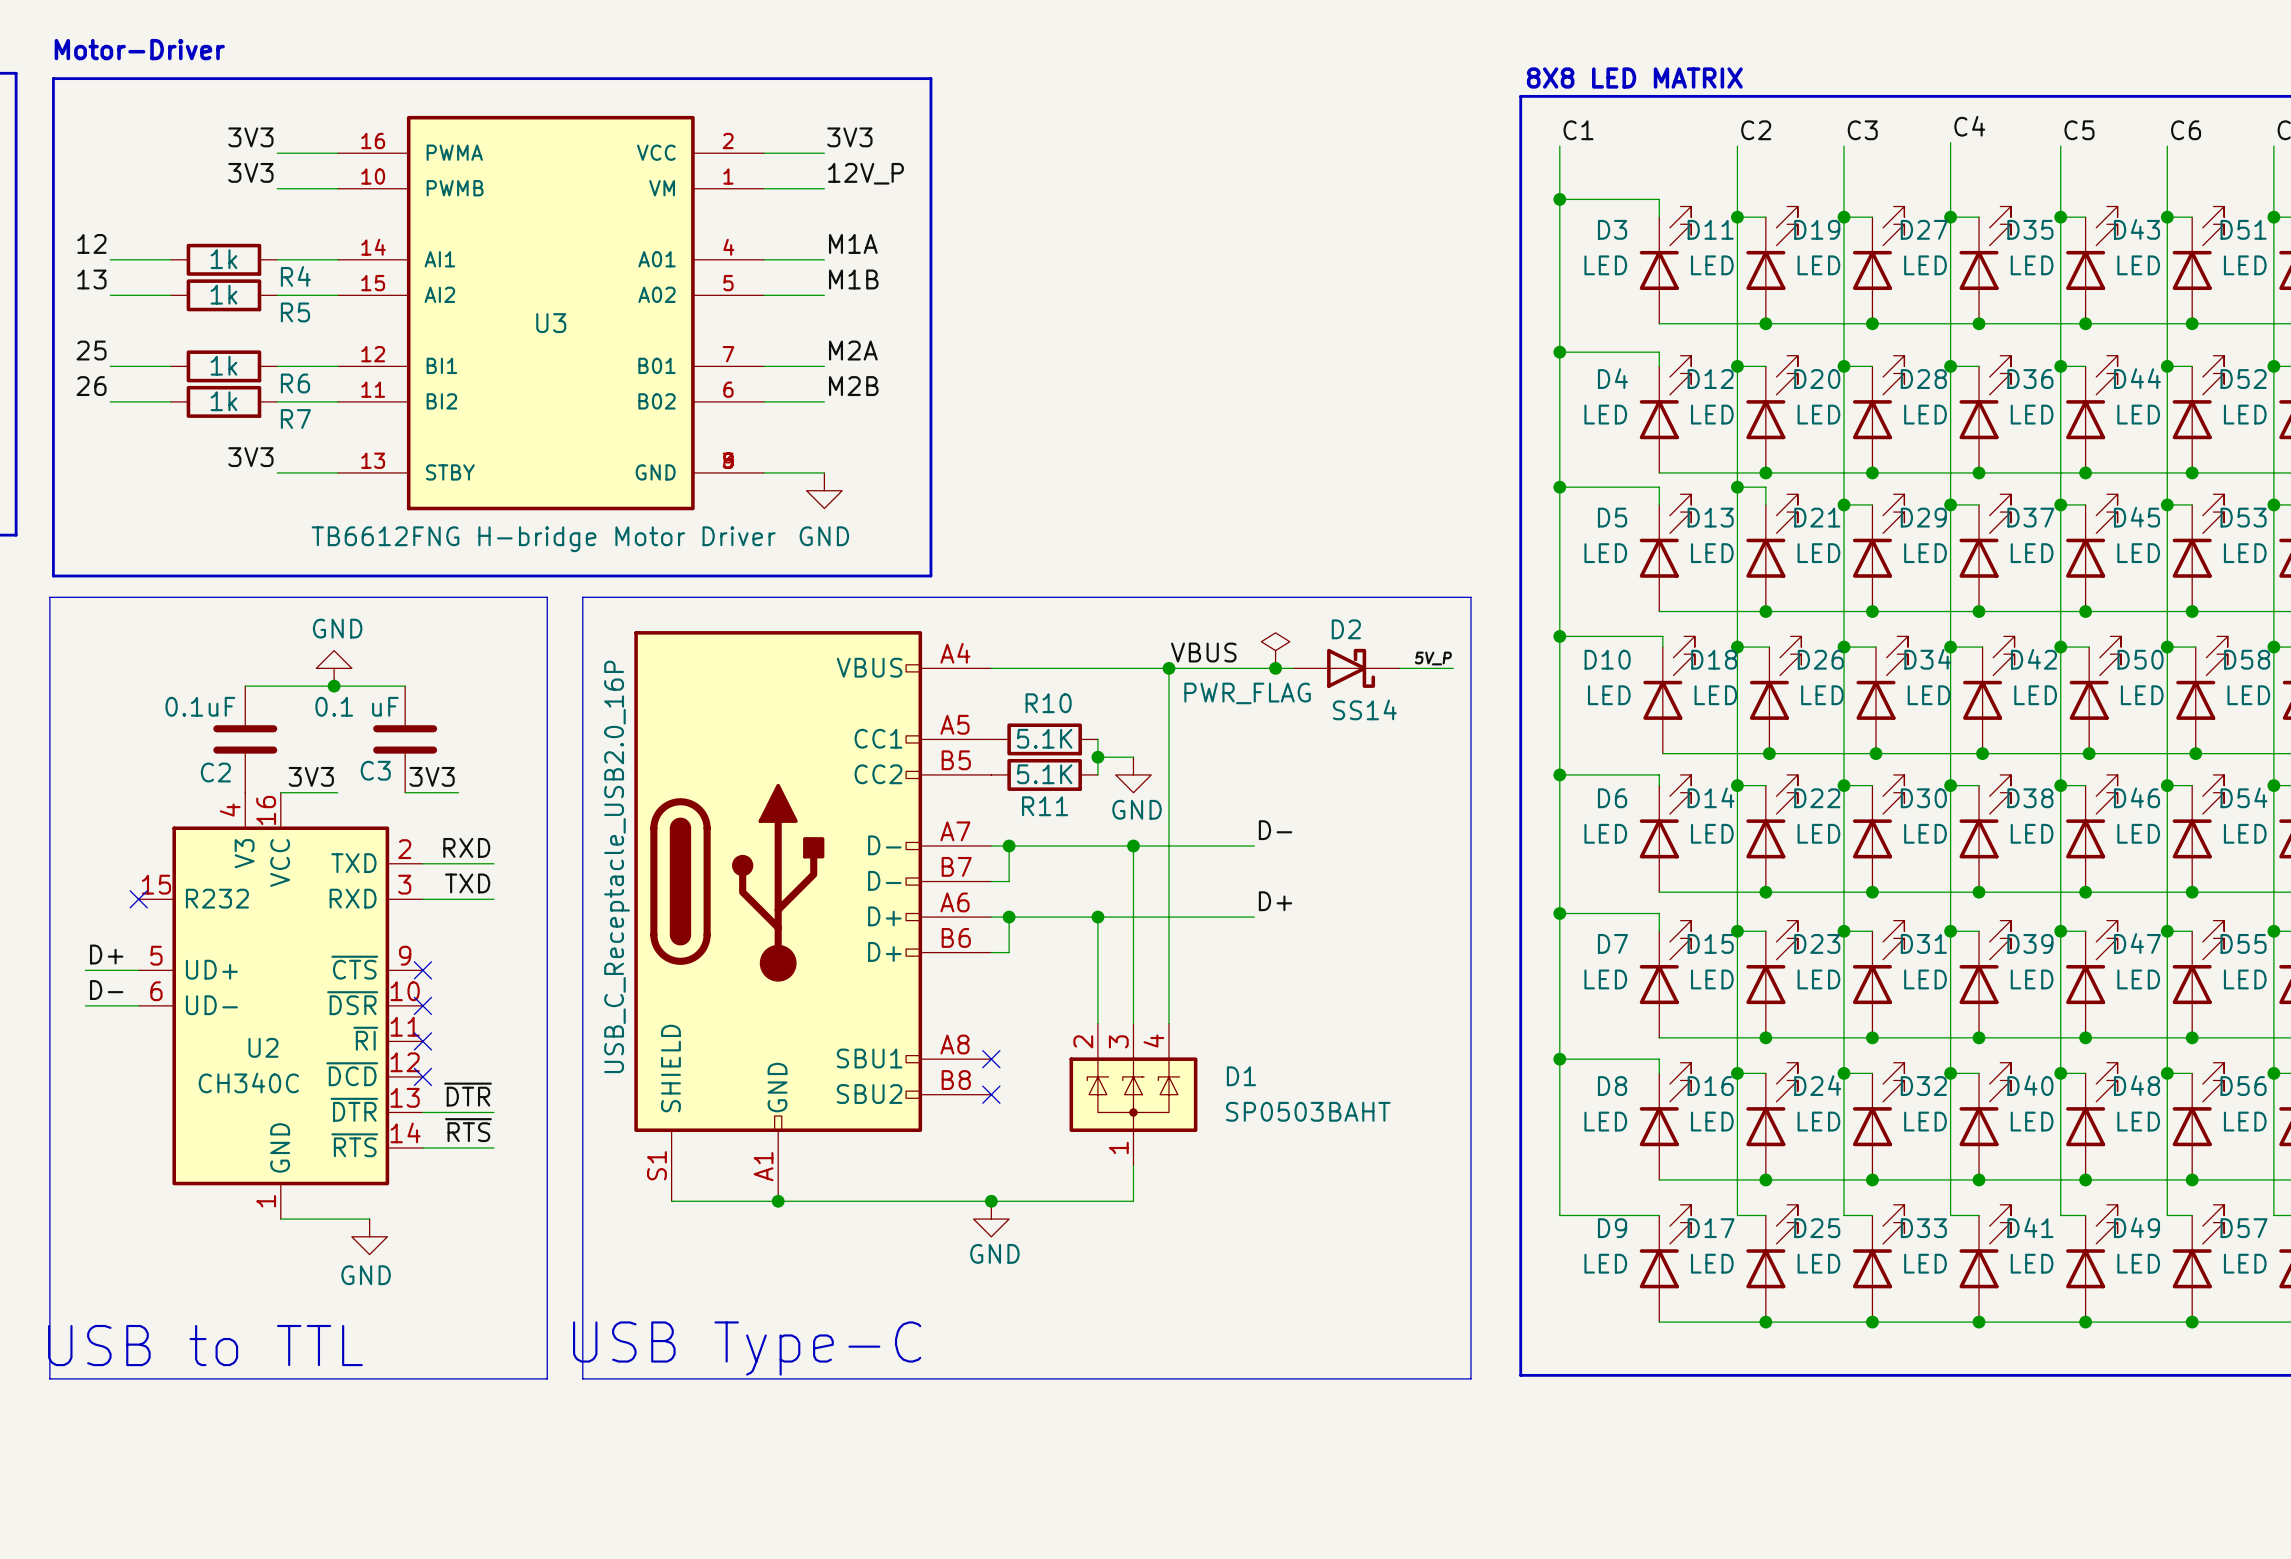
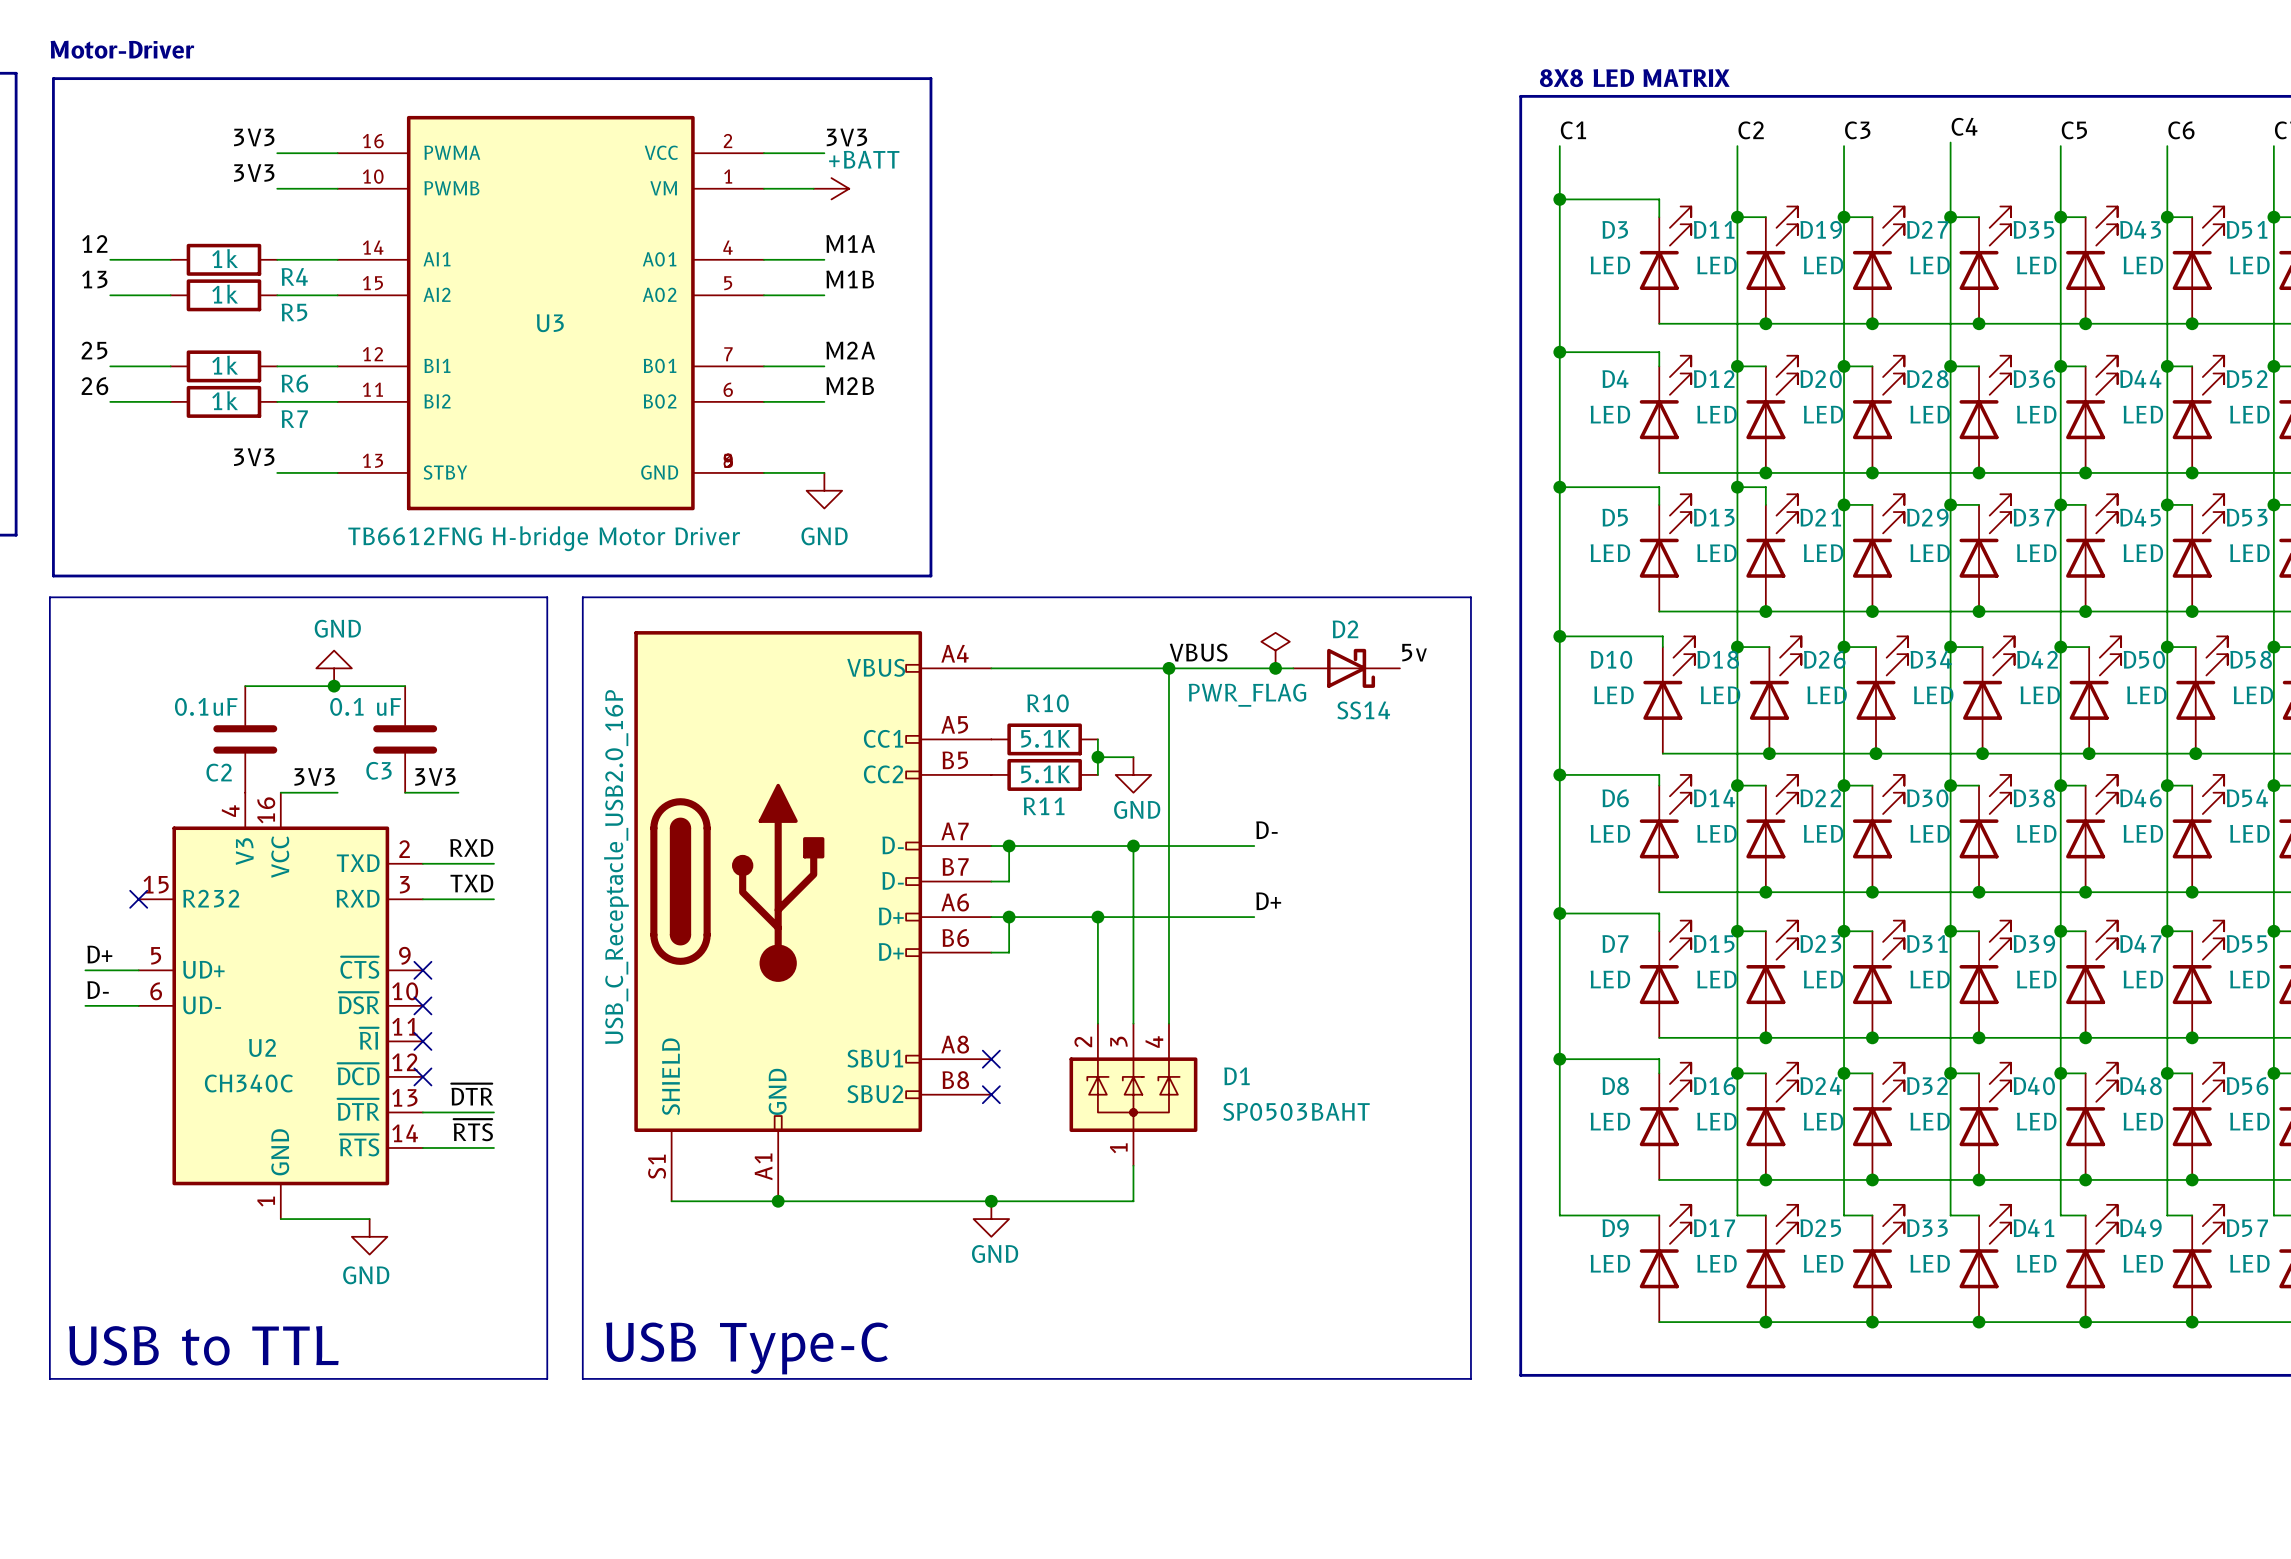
label: 12V_P (866, 173) -> none
power symbol: none -> +BATT (831, 188)
label: none -> 5v (1414, 652)
label: 5V_P (1433, 658) -> none
wire: (1399, 668) (1453, 668) -> none

